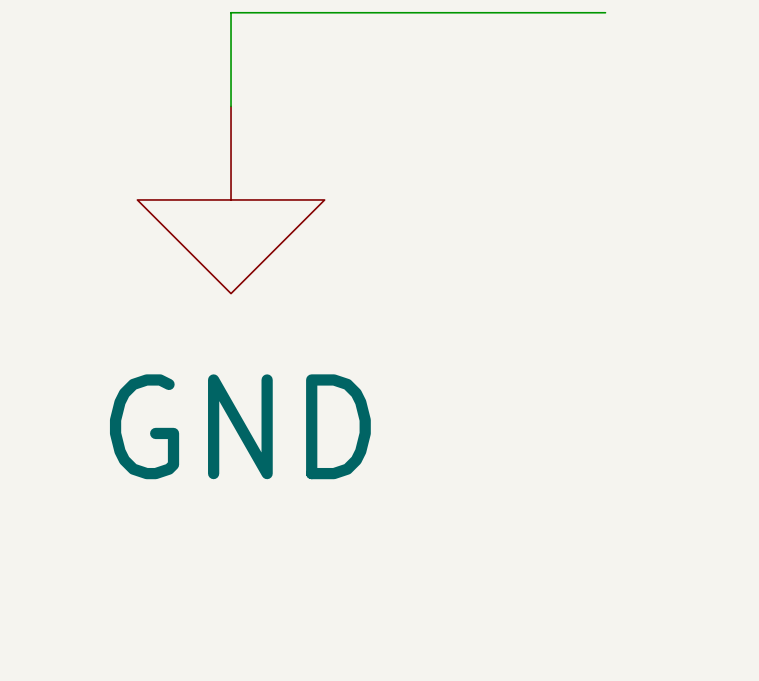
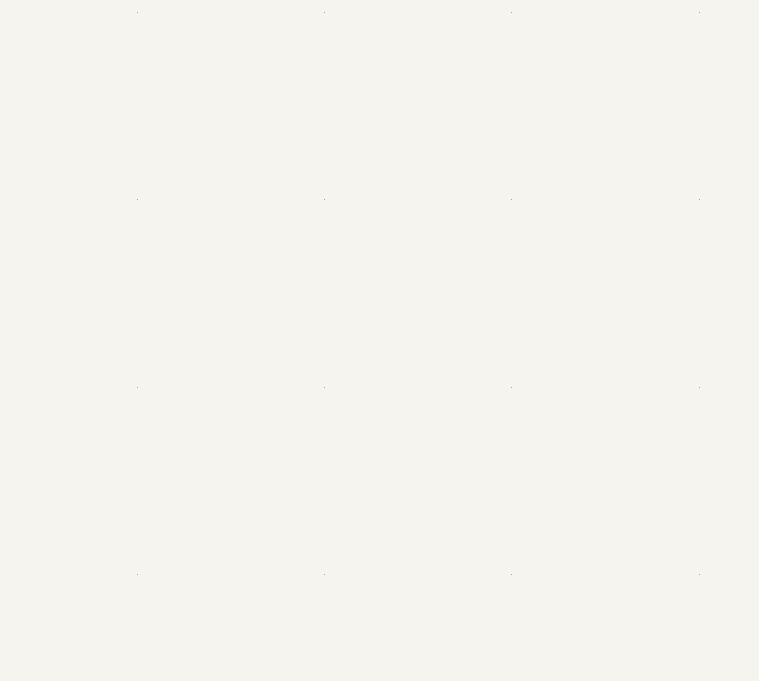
wire: (605, 12) (231, 12) (231, 106) -> none
power symbol: GND (231, 199) -> none

